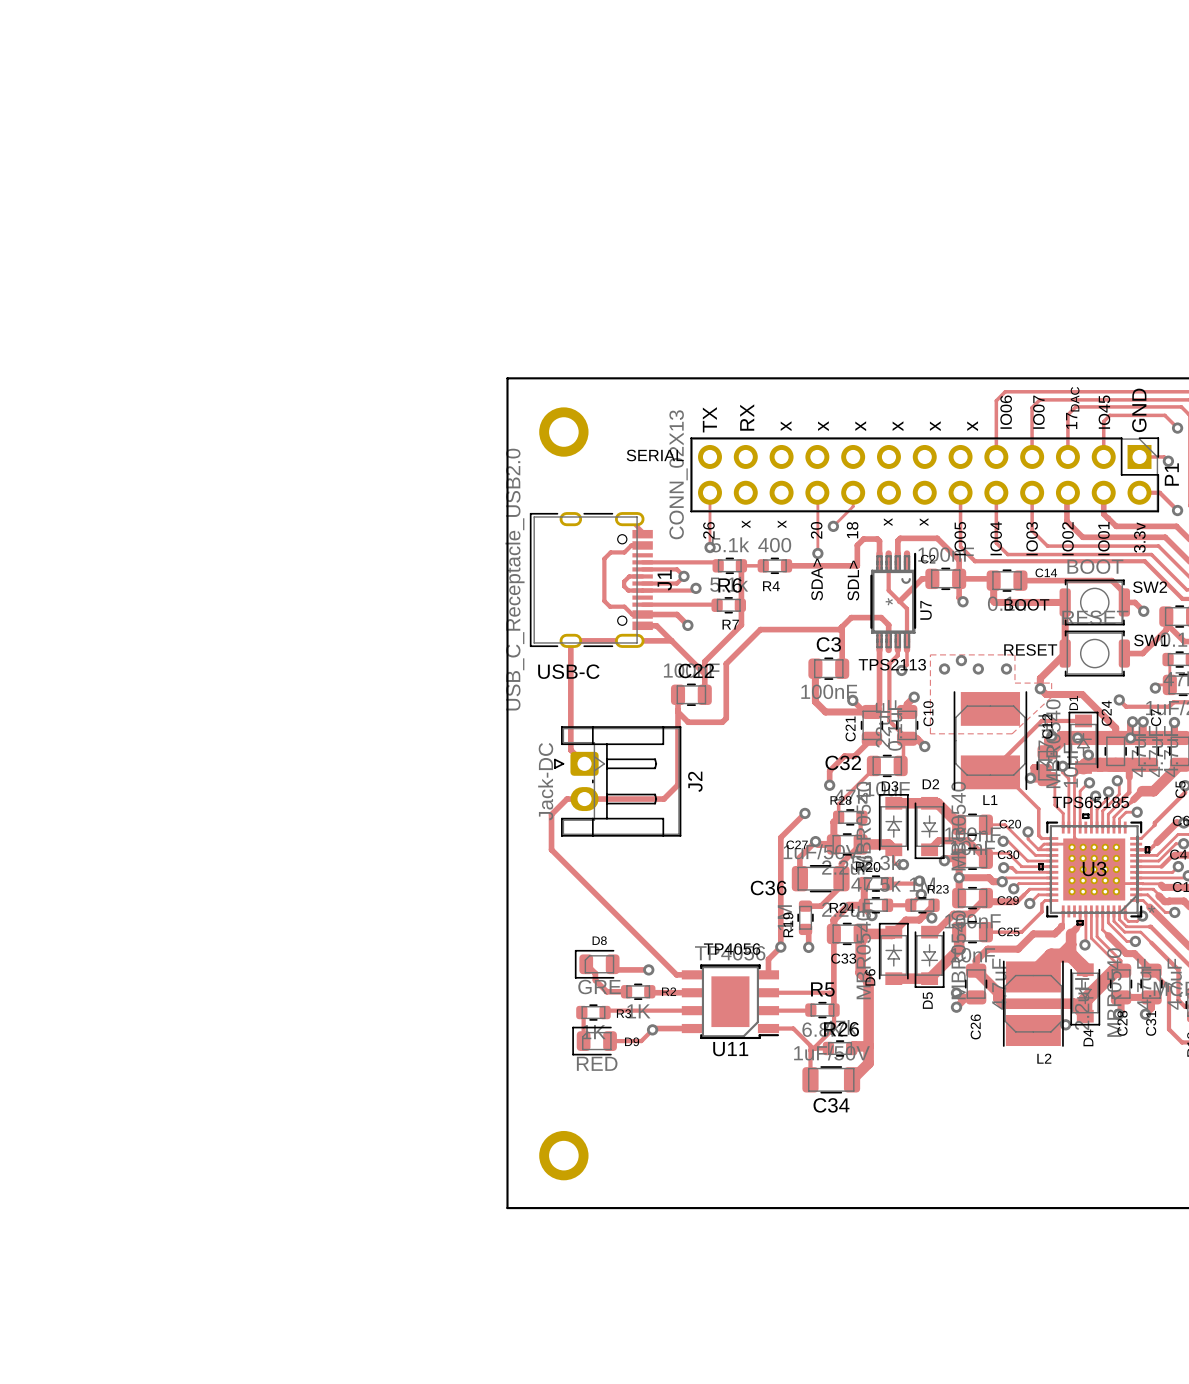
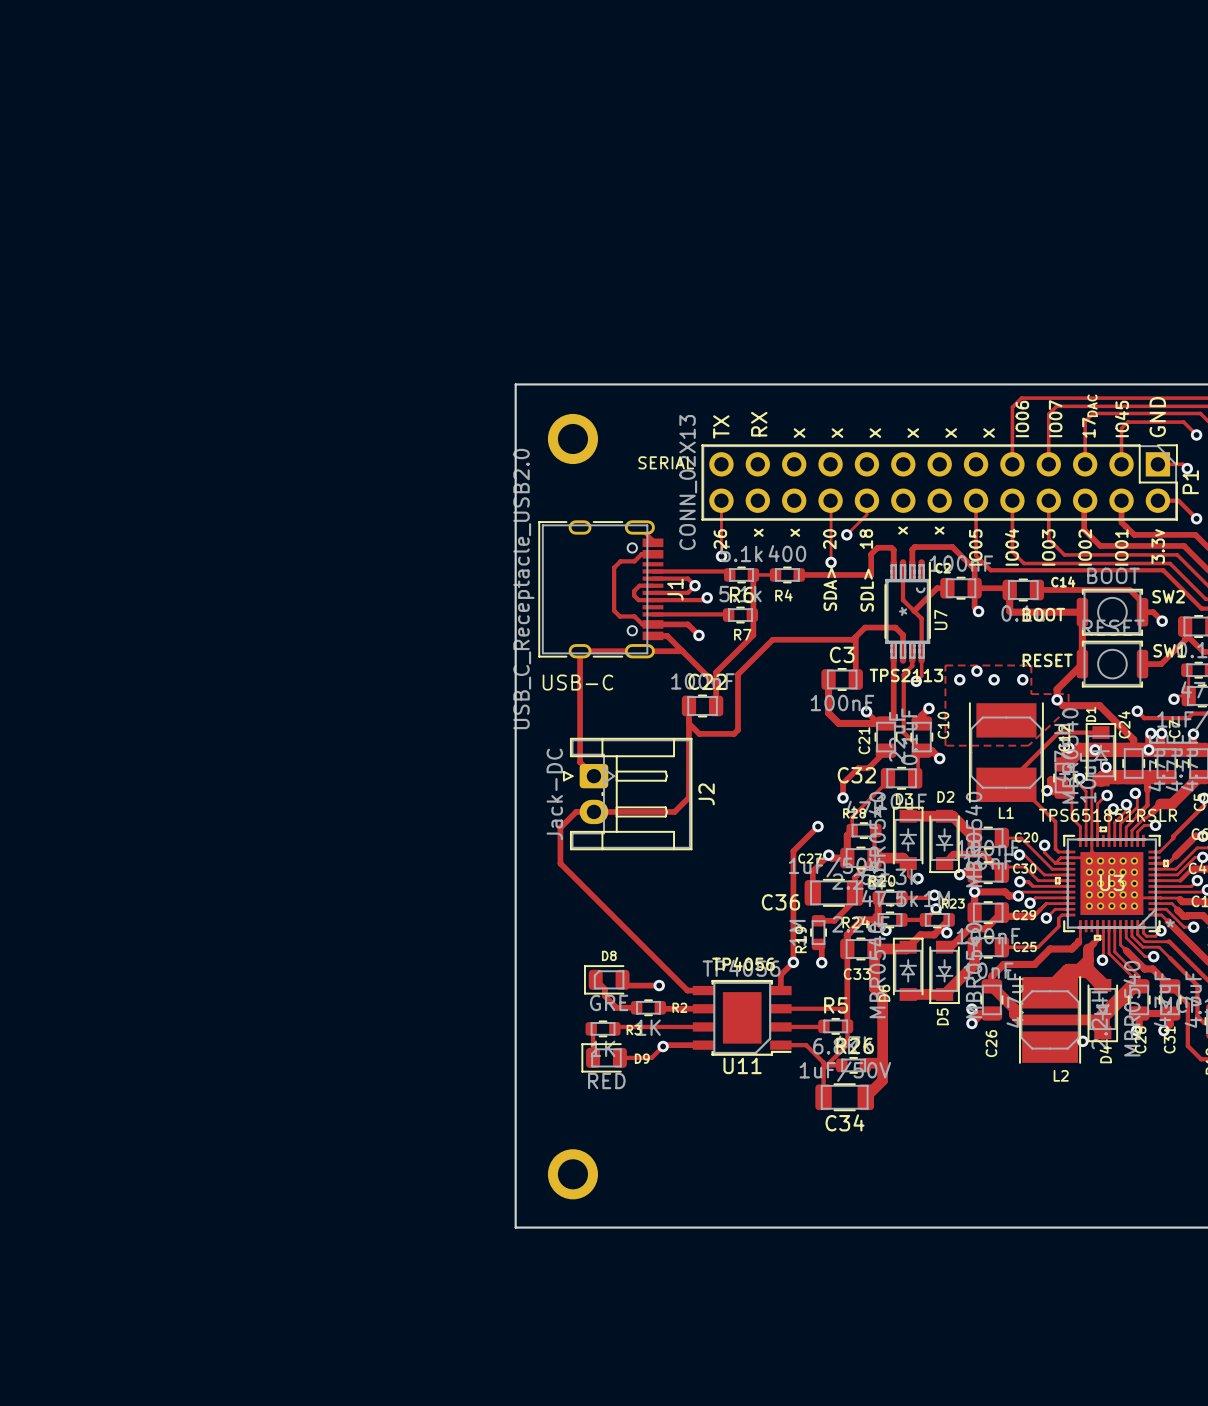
U3 value: TPS65185 (1090, 802) -> TPS651851RSLR (1108, 815)

